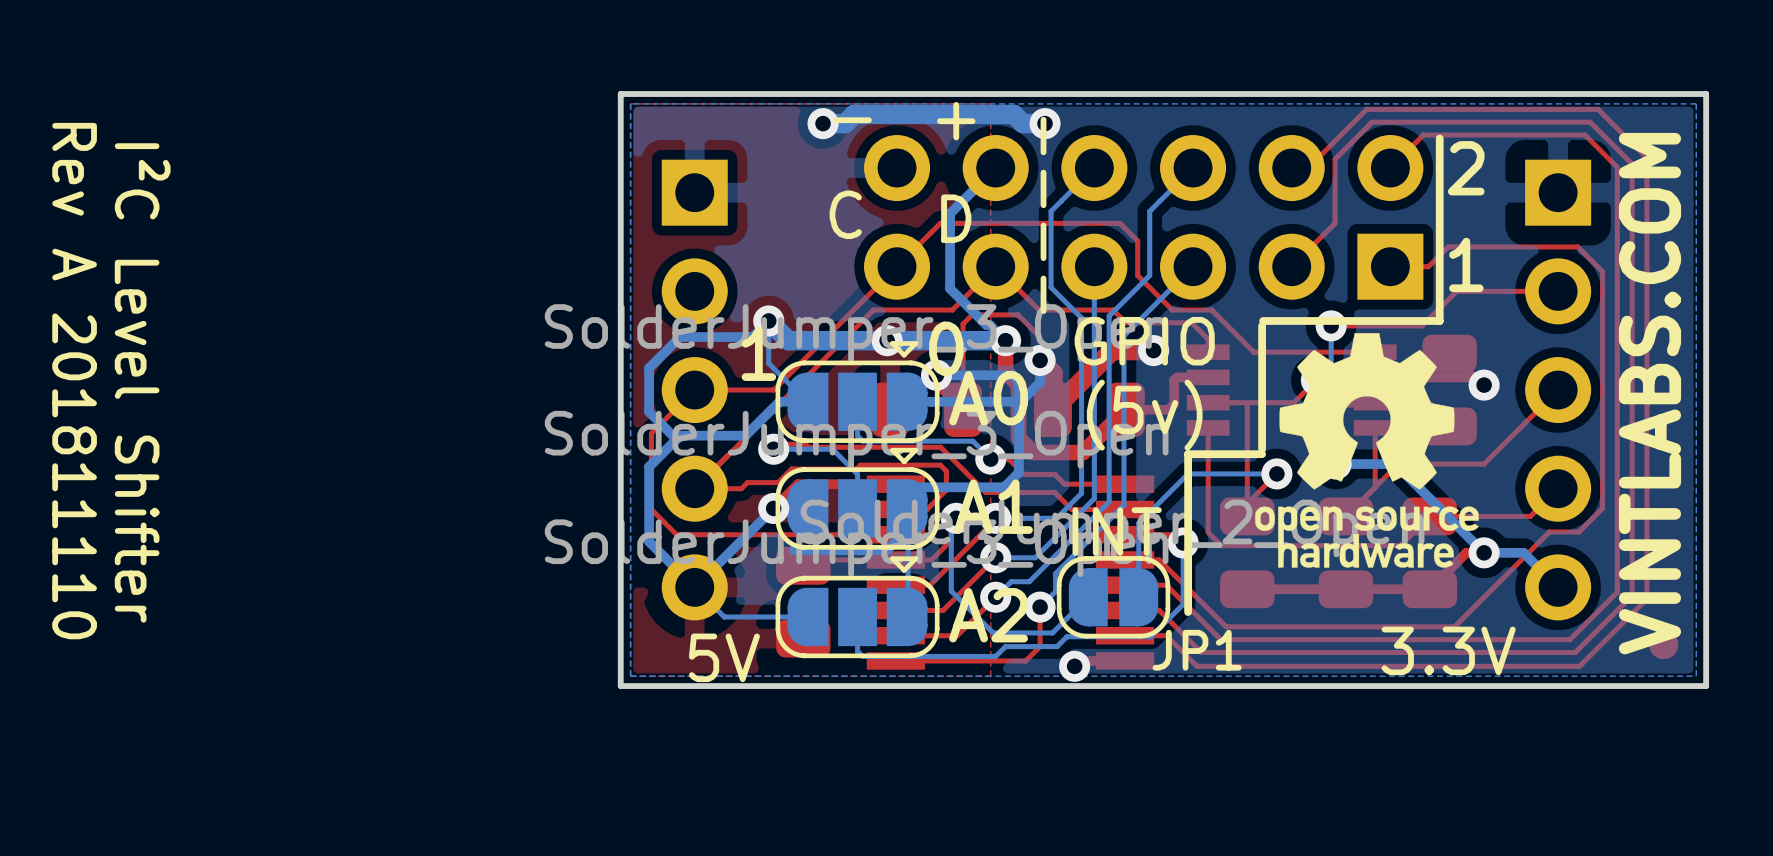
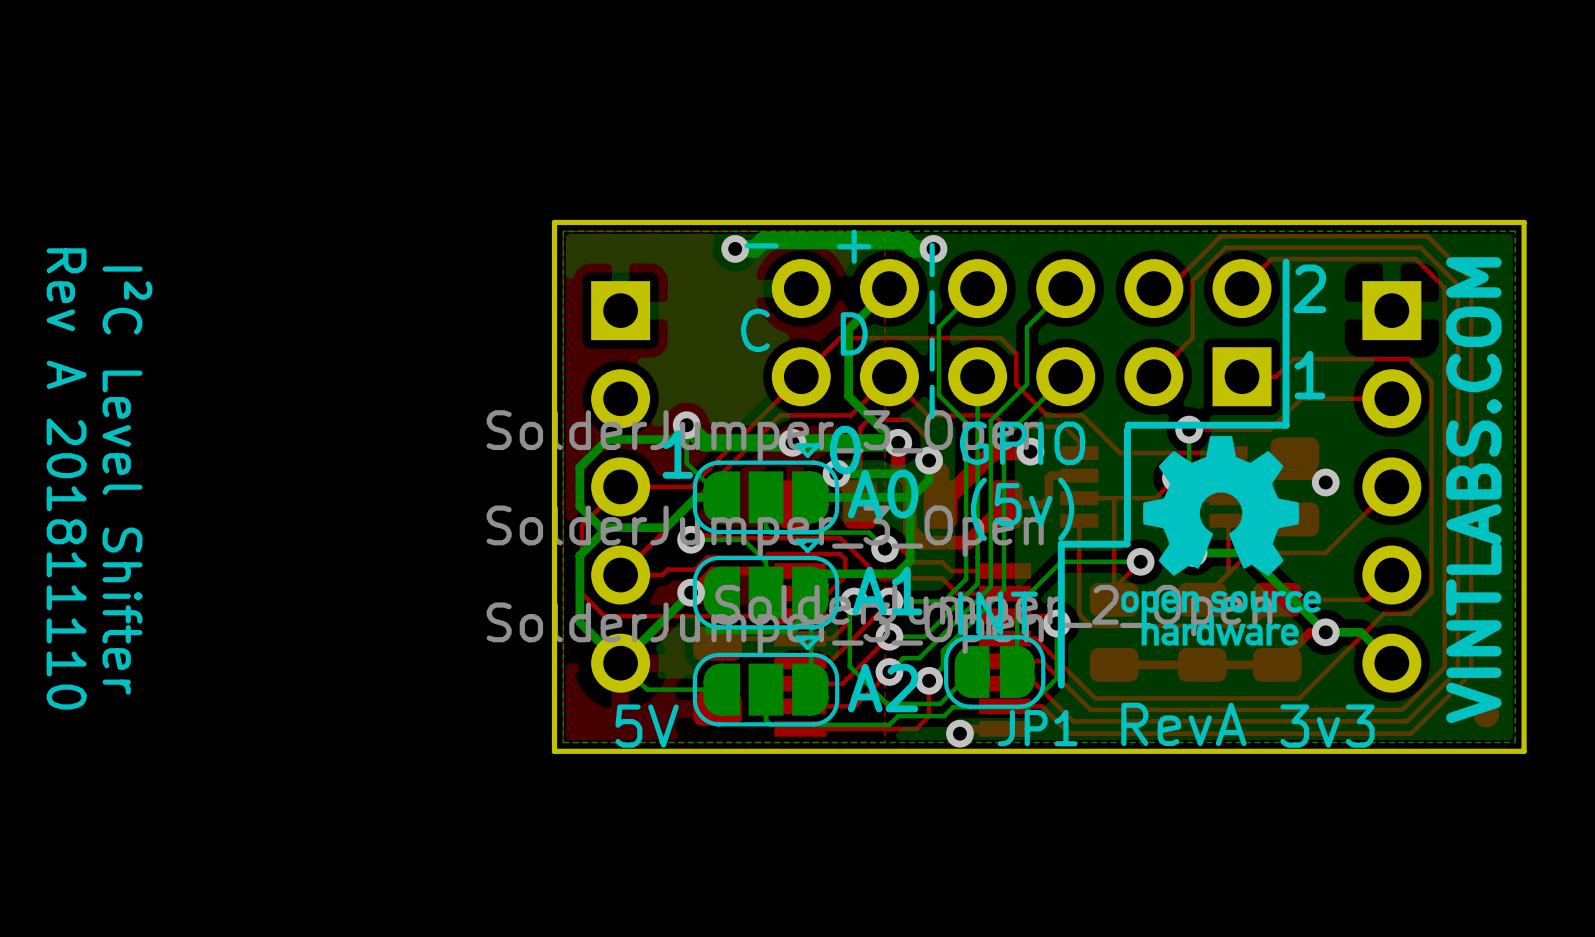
JP1 name position: JP1 (1197, 650) -> JP1 (1037, 728)
text: 3.3V (1448, 650) -> none
text: none -> RevA (1183, 724)
text: none -> 3v3 (1327, 726)

